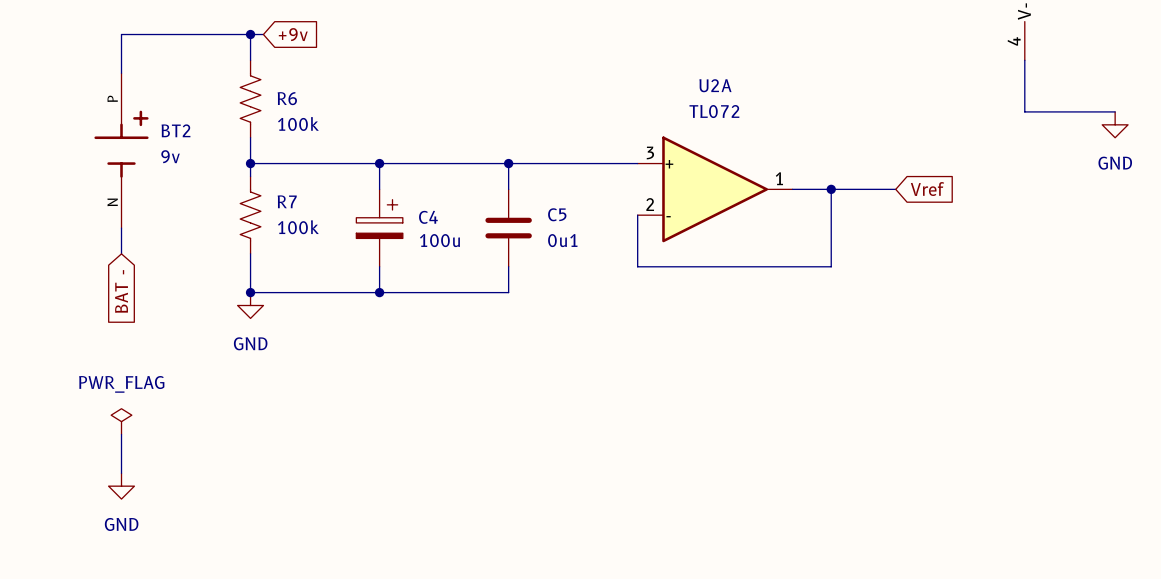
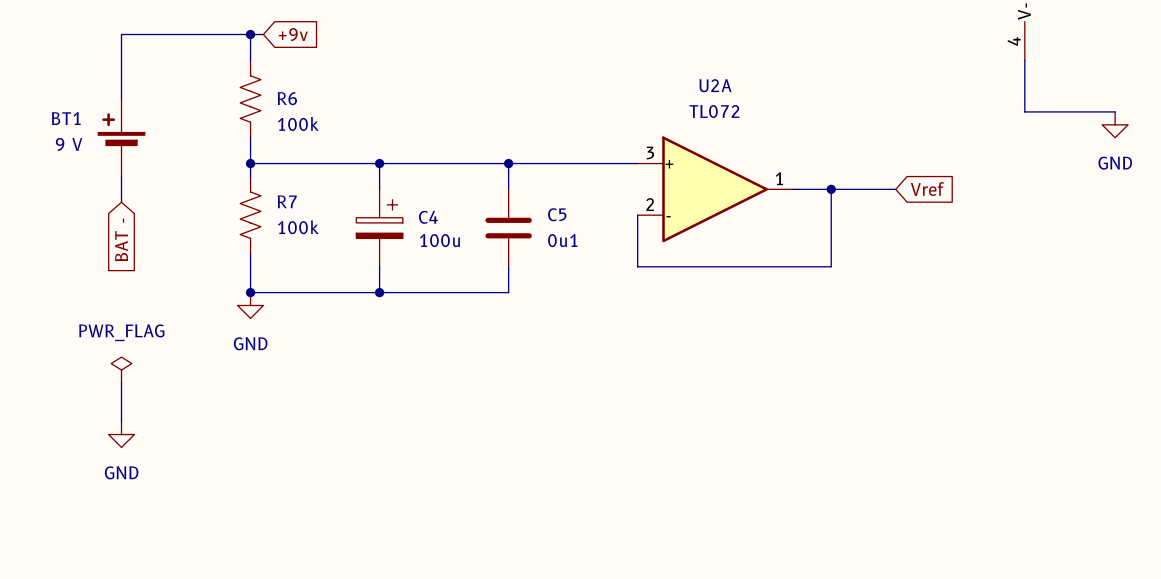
BT1: none -> 9 V (121, 137)
BT2: 9v (121, 150) -> none
global label position: BAT - (121, 291) -> BAT - (121, 239)
power symbol position: PWR_FLAG (121, 421) -> PWR_FLAG (121, 370)
wire: (121, 434) (121, 473) -> (121, 382) (121, 421)
power symbol position: GND (121, 486) -> GND (121, 434)

